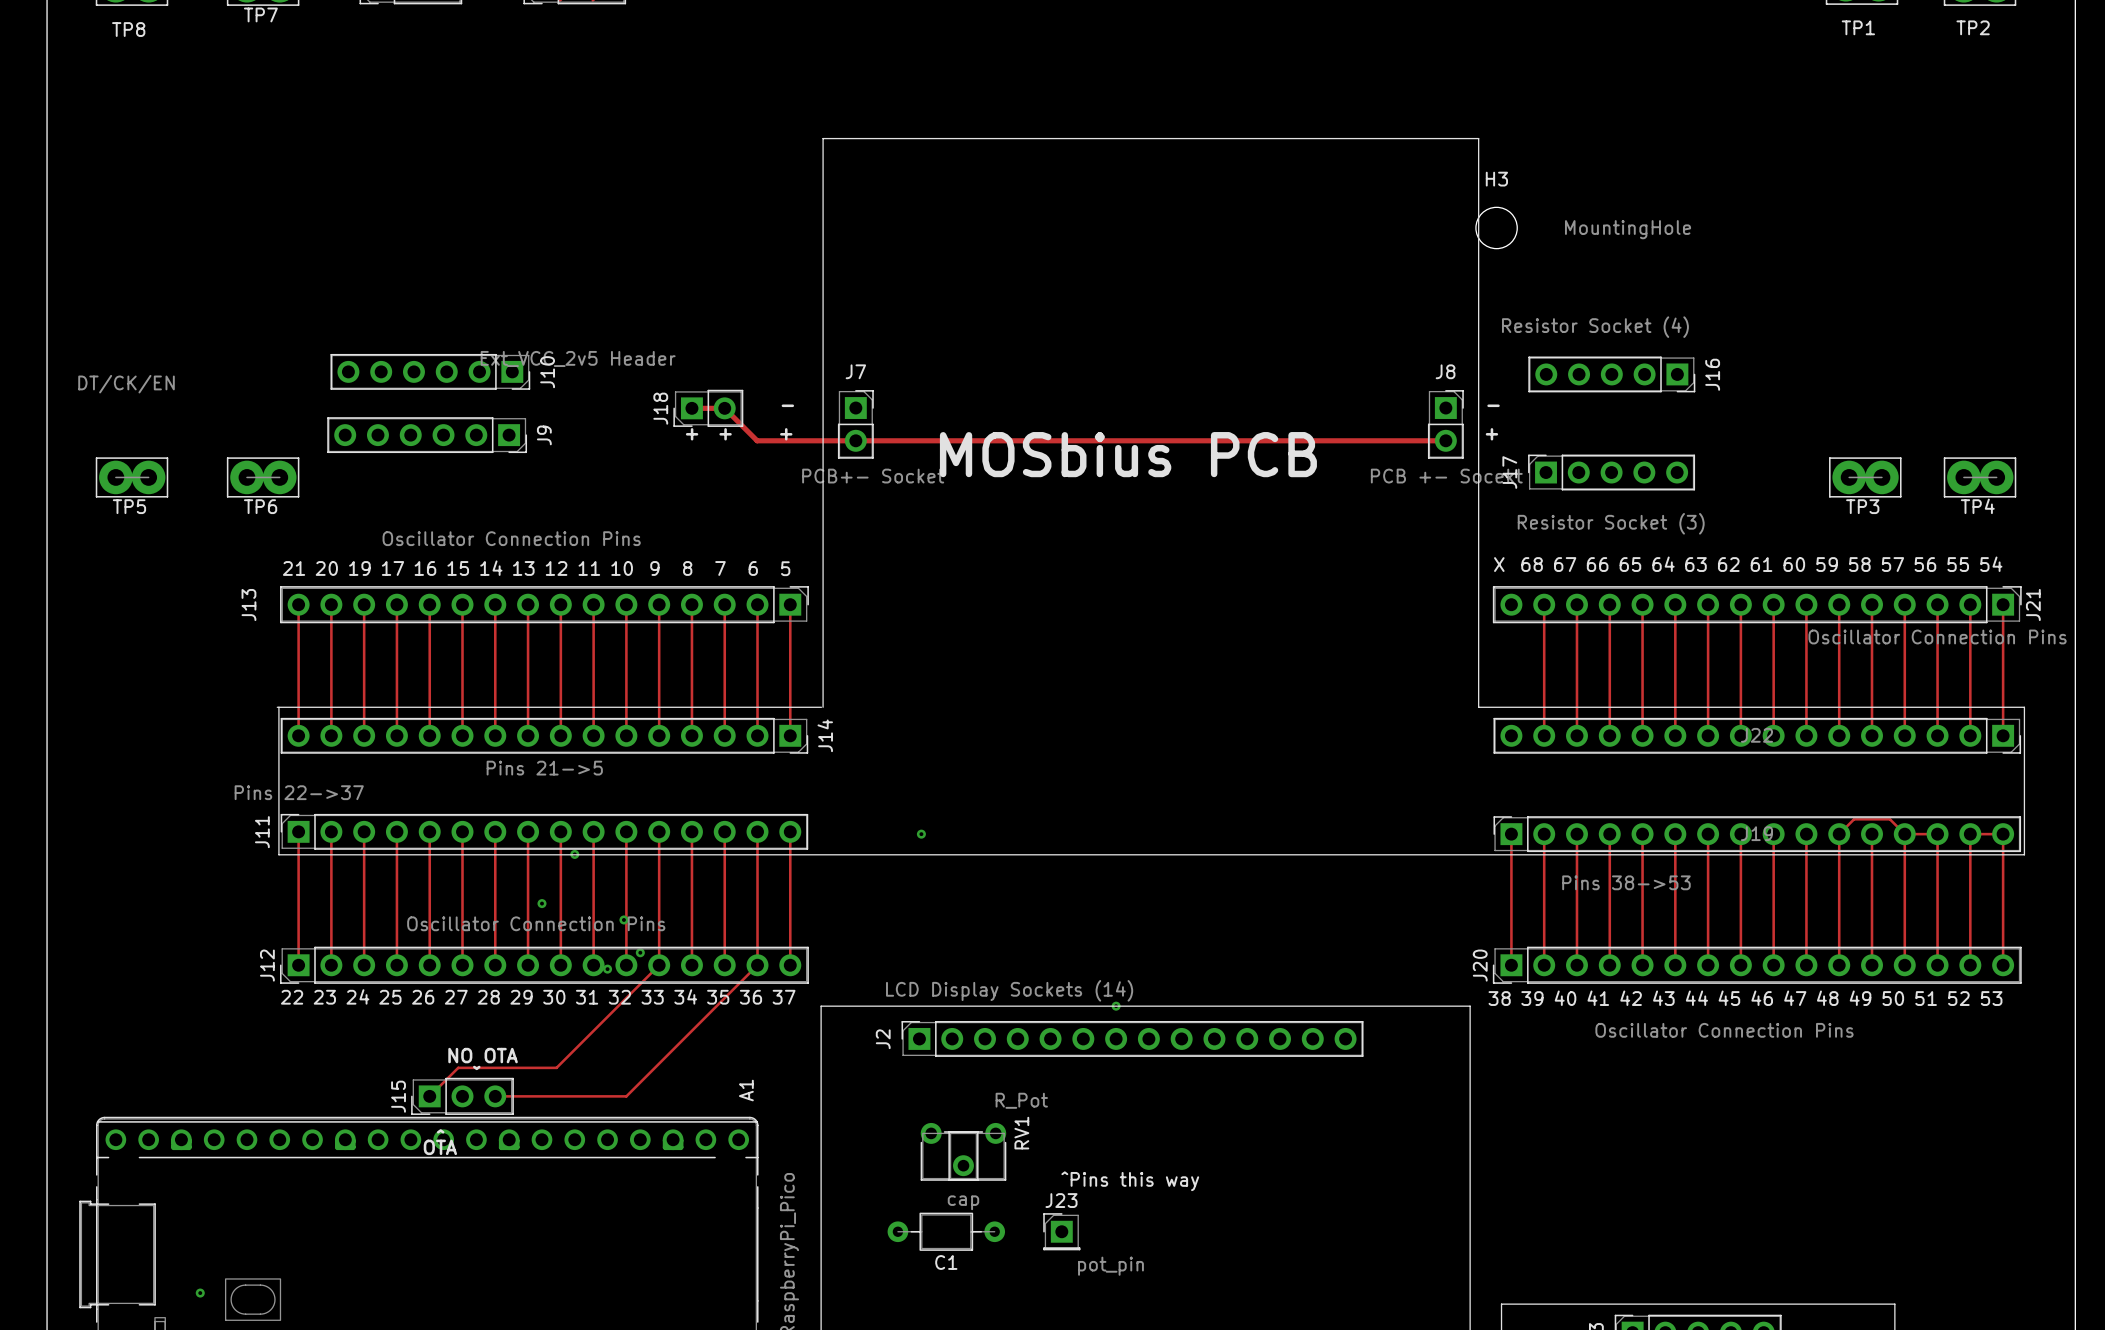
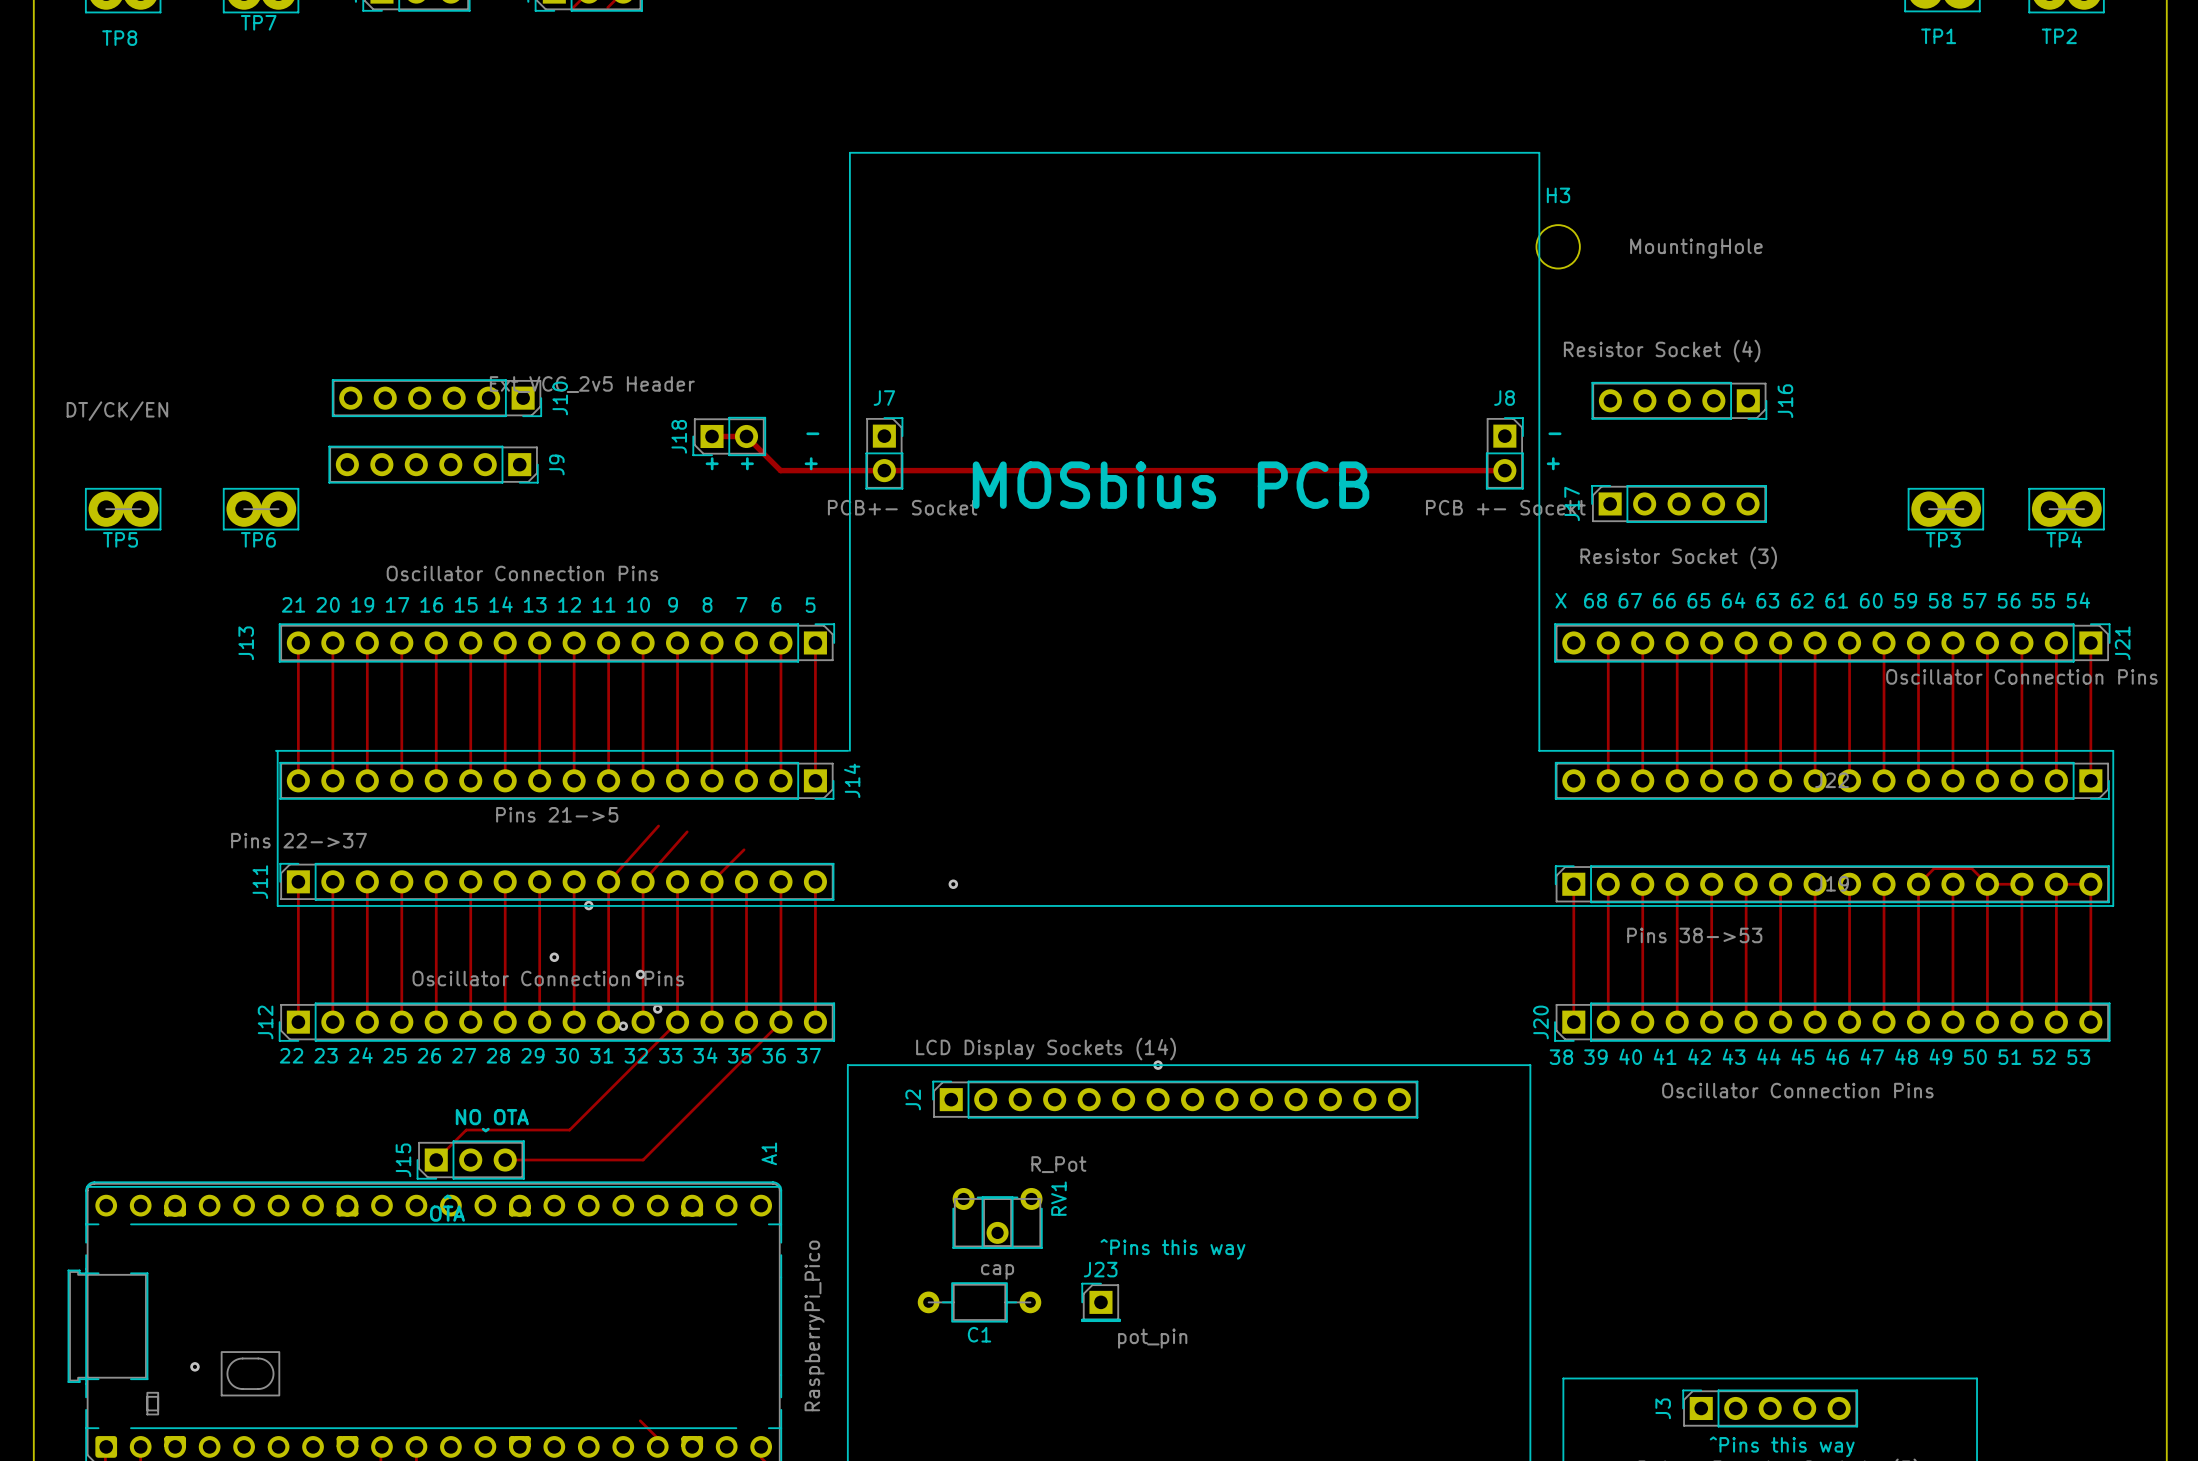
track: none -> (658, 826) (608, 881)
track: none -> (687, 831) (643, 881)
track: none -> (744, 849) (712, 881)

